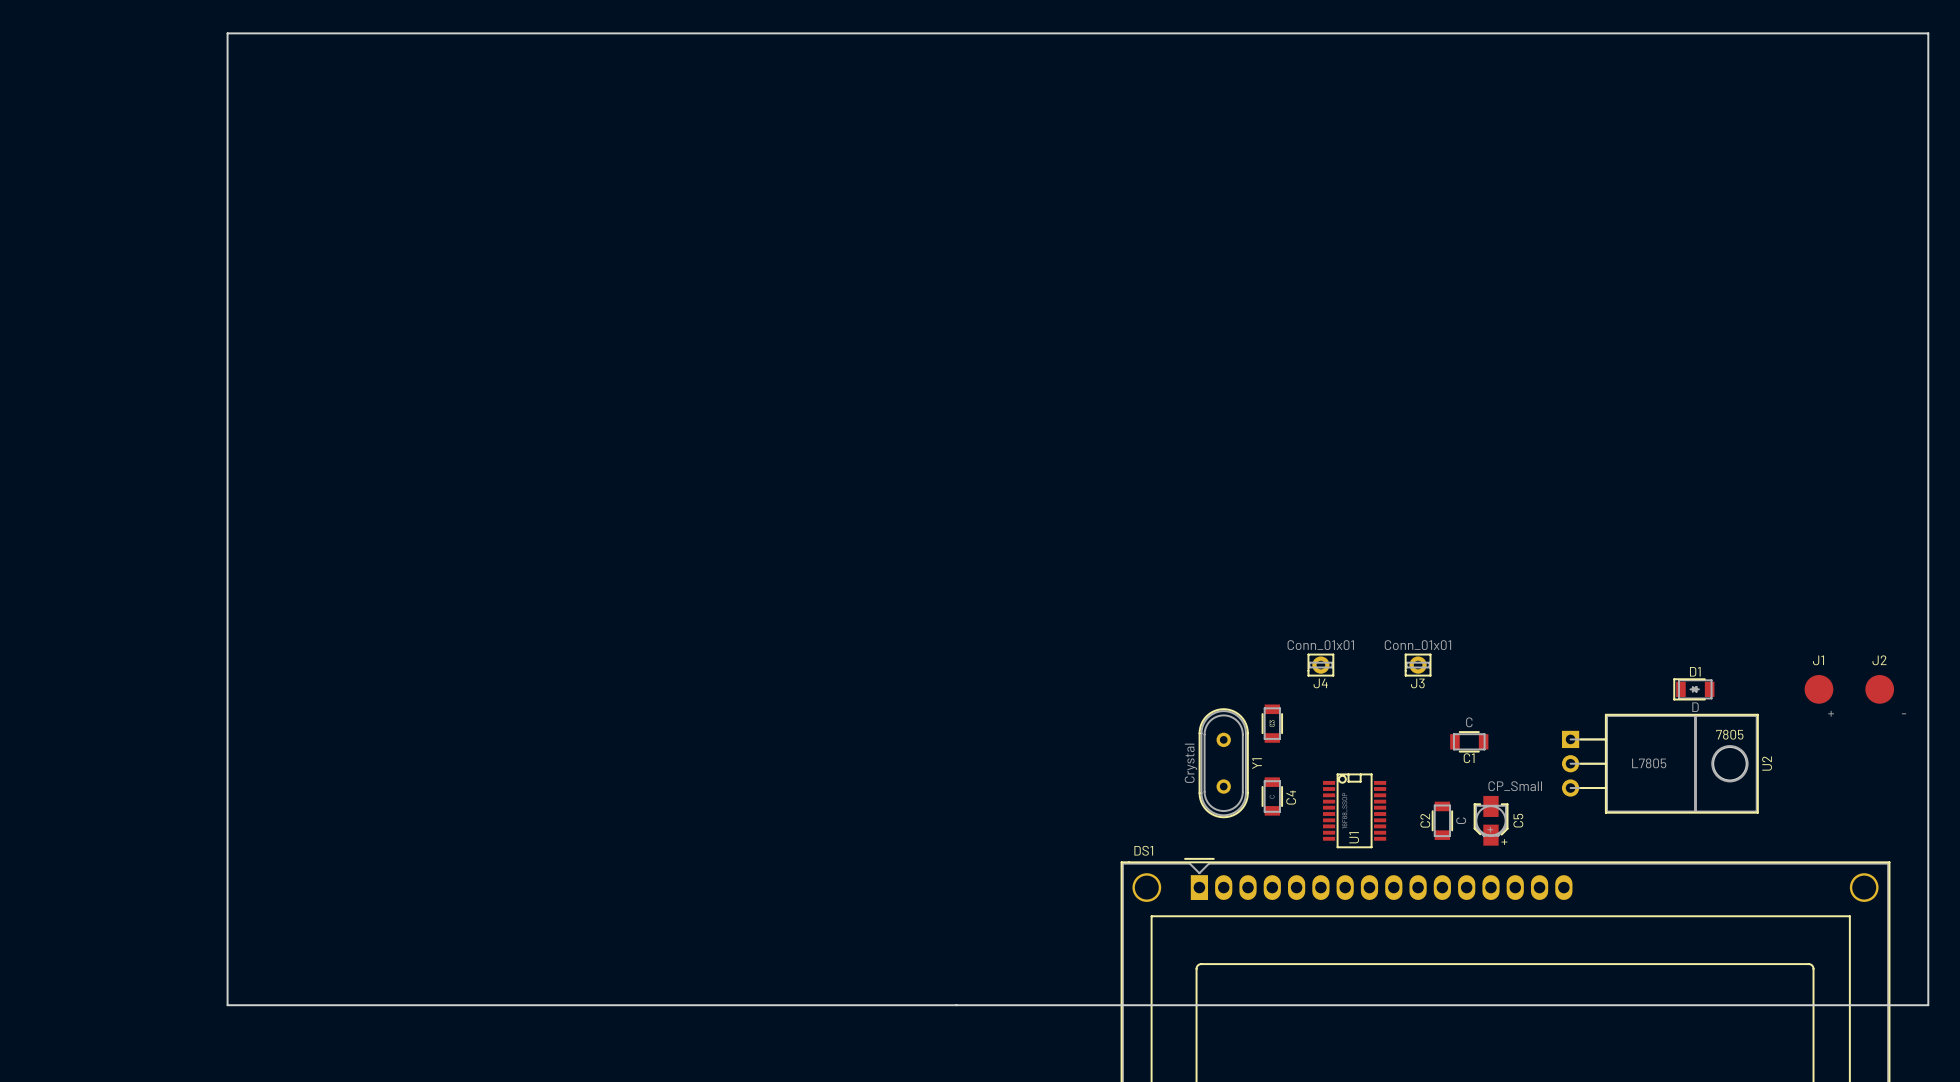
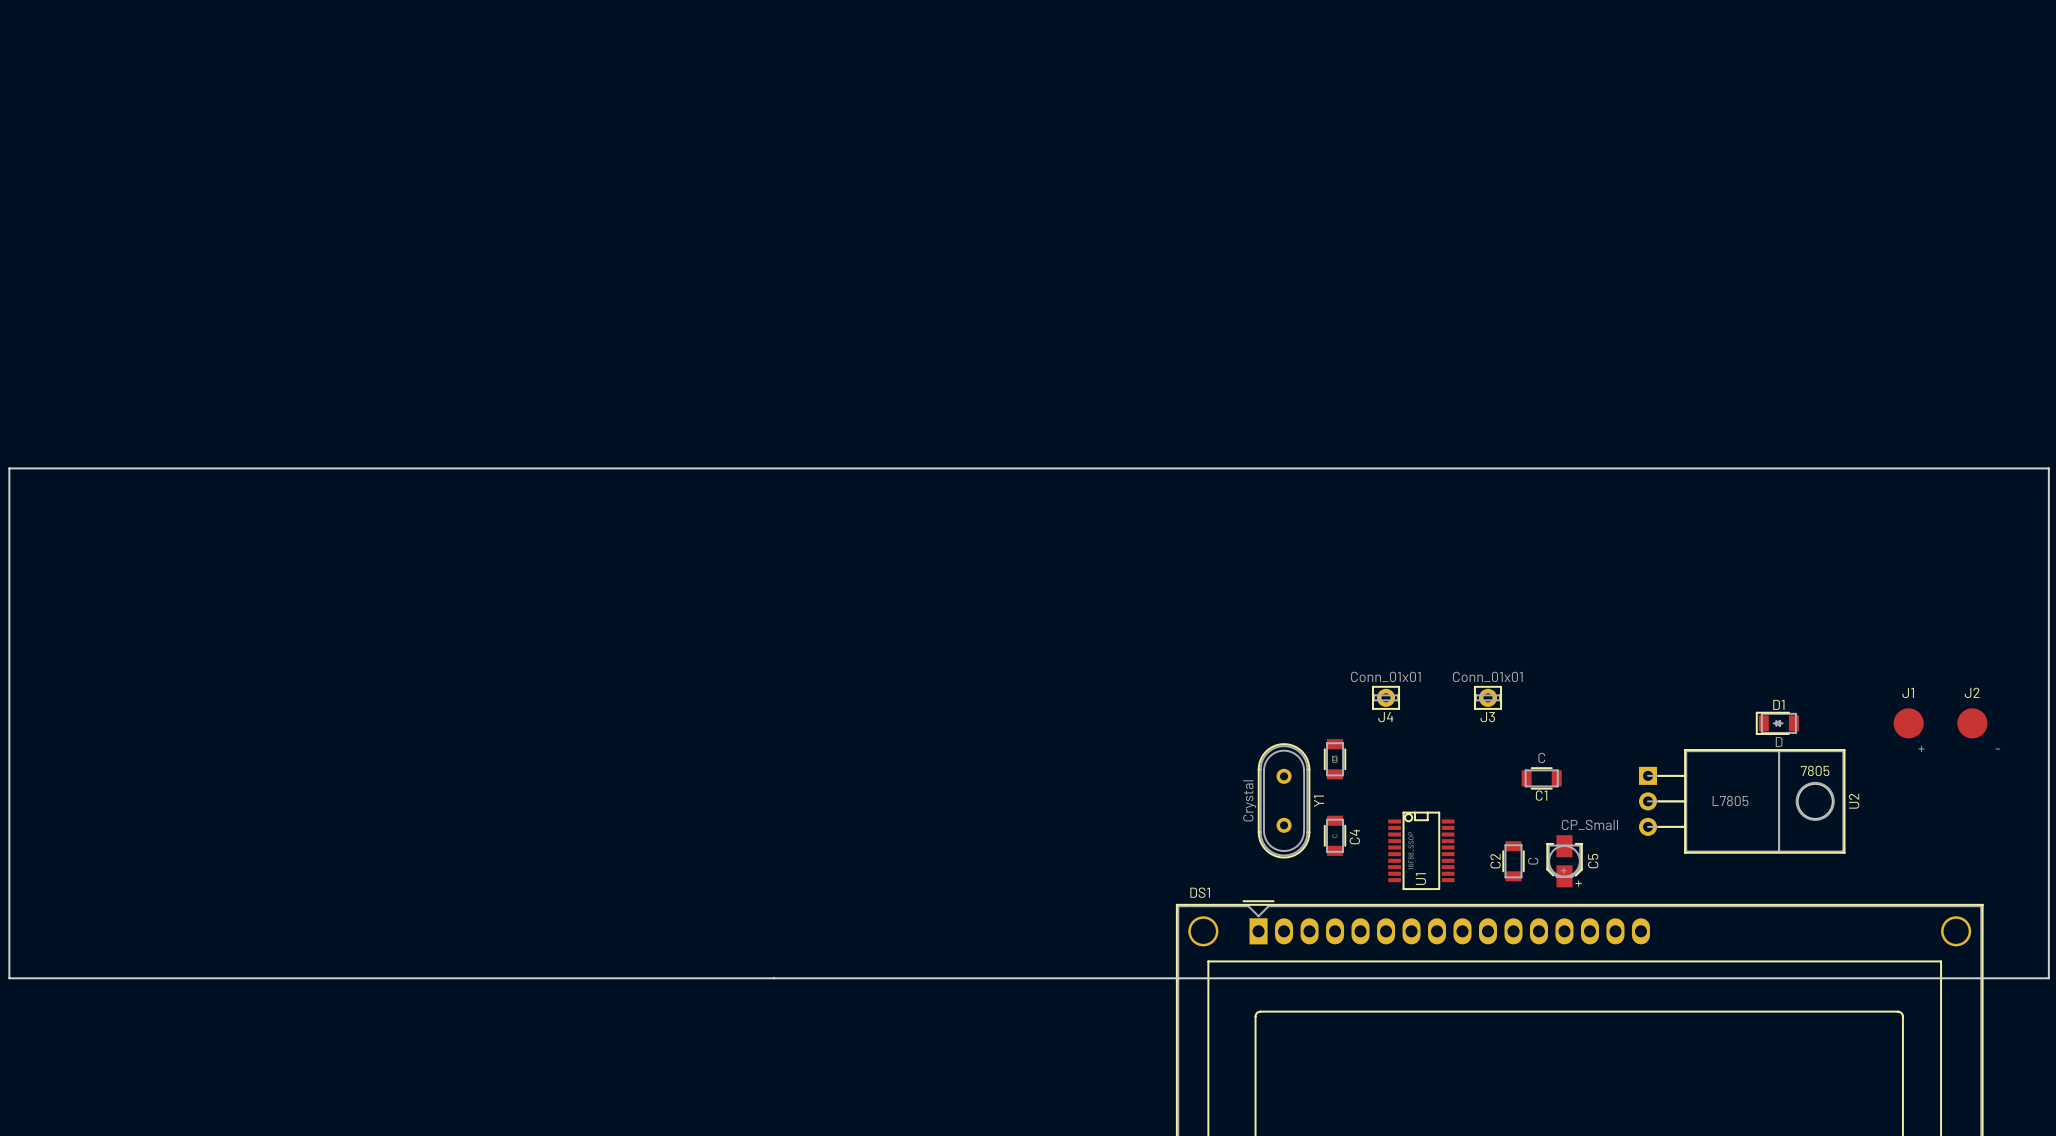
board edge: (227, 33) (227, 1005) (1928, 1005) (1928, 33) (227, 33) -> none
board edge: none -> (9, 468) (9, 978) (2048, 978) (2048, 468) (9, 468)

